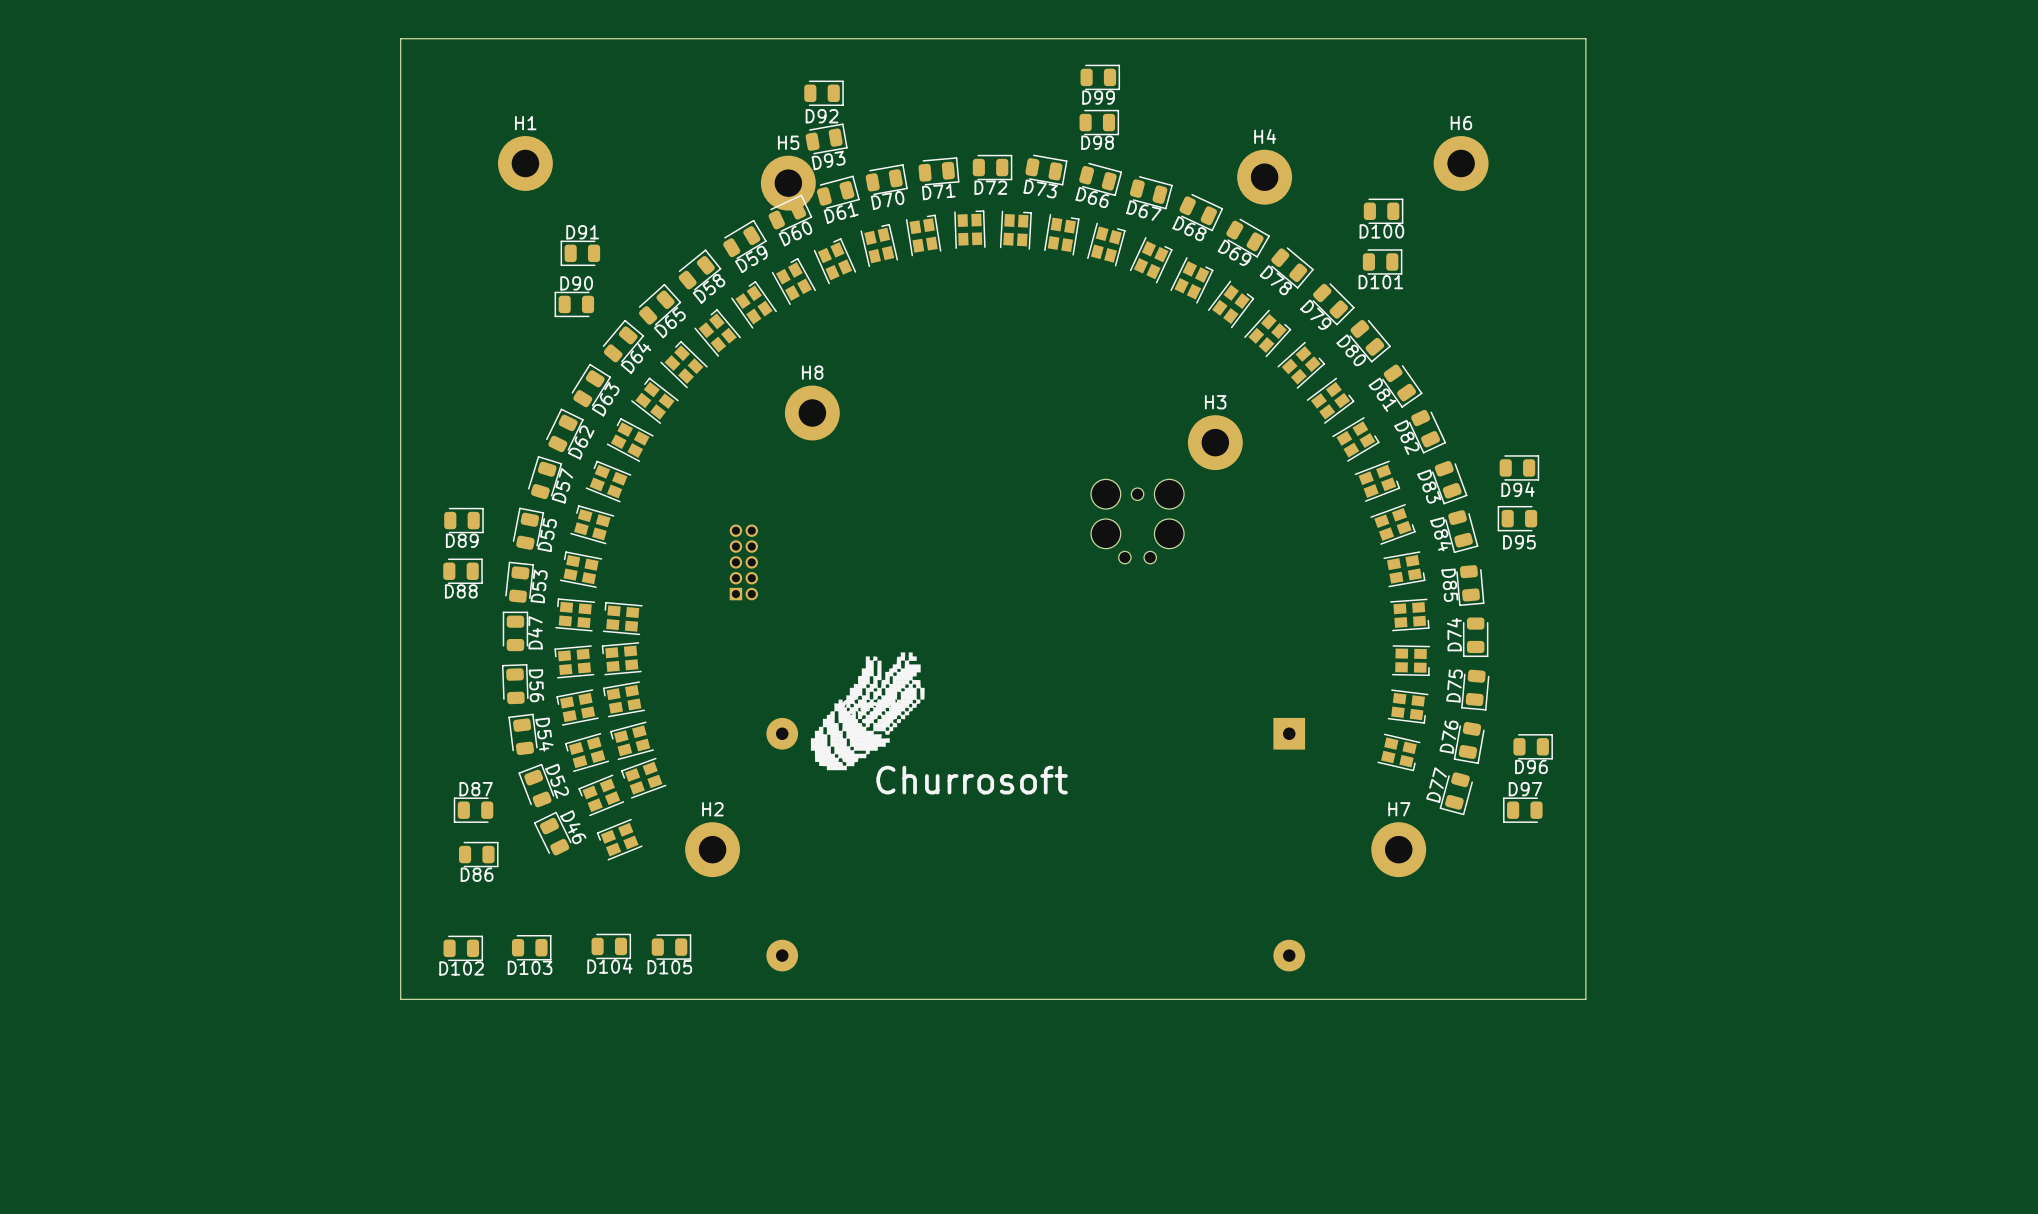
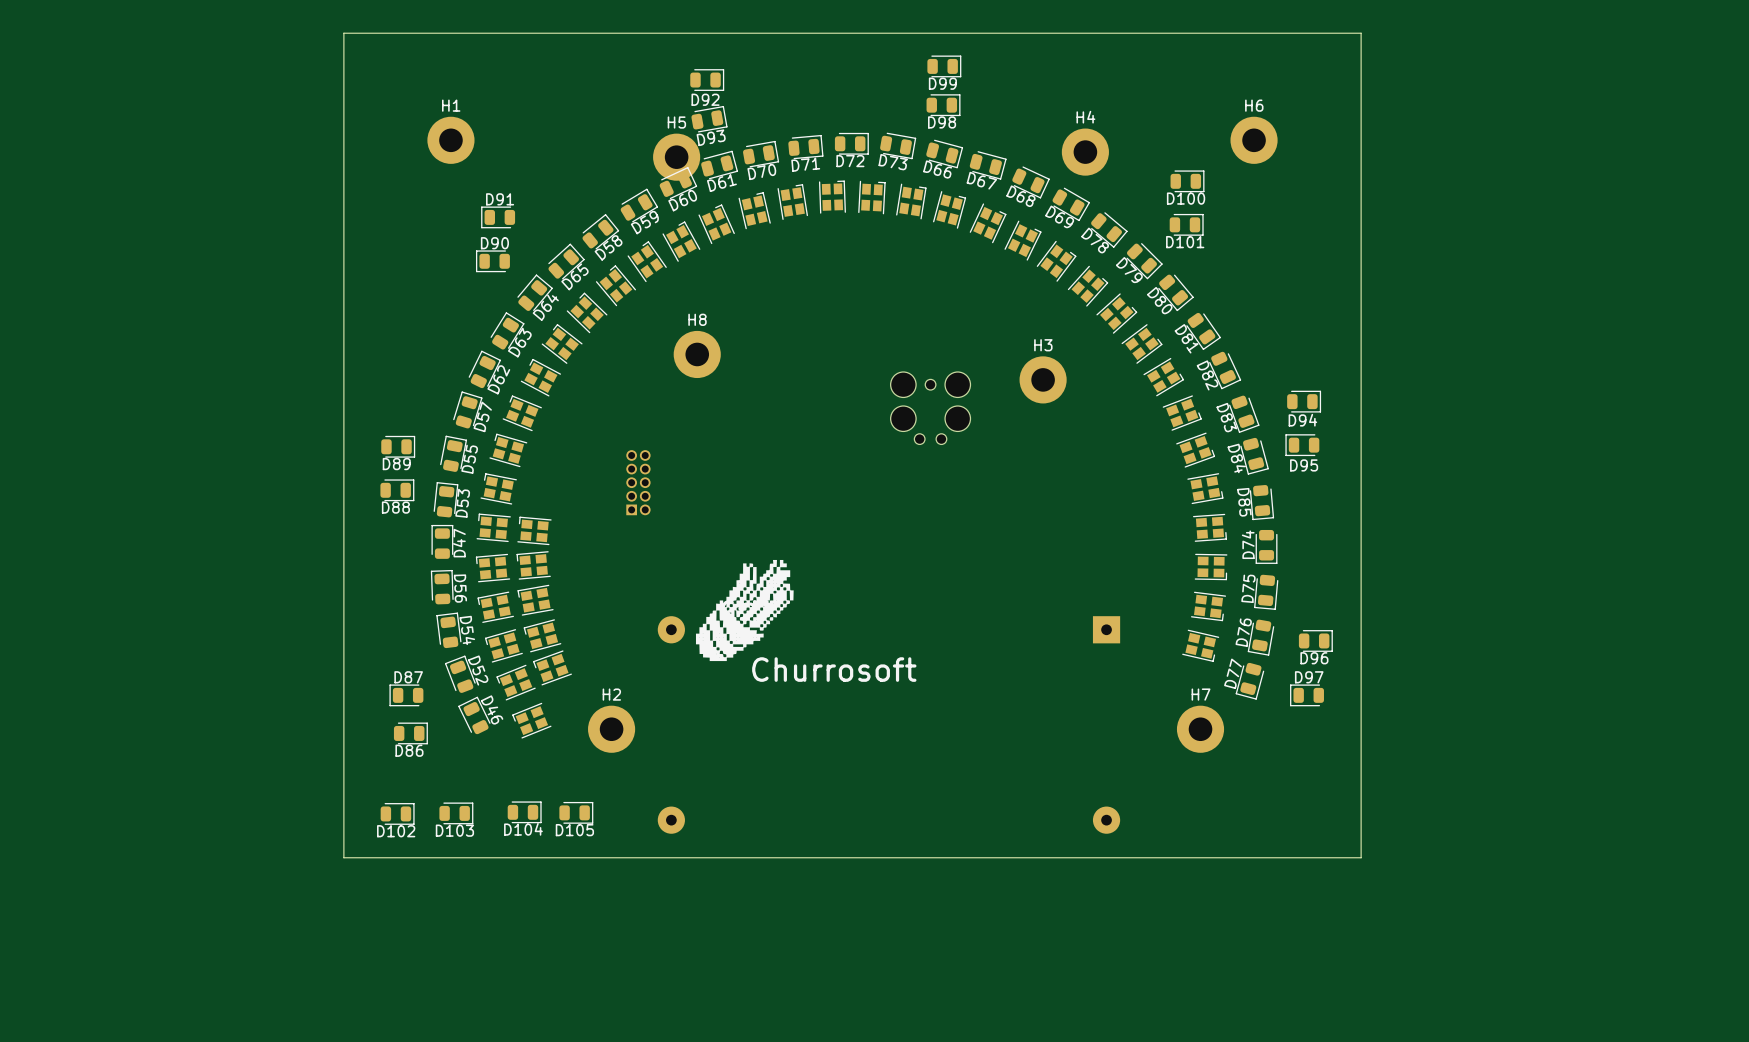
part position: (1137, 521) -> (930, 408)

